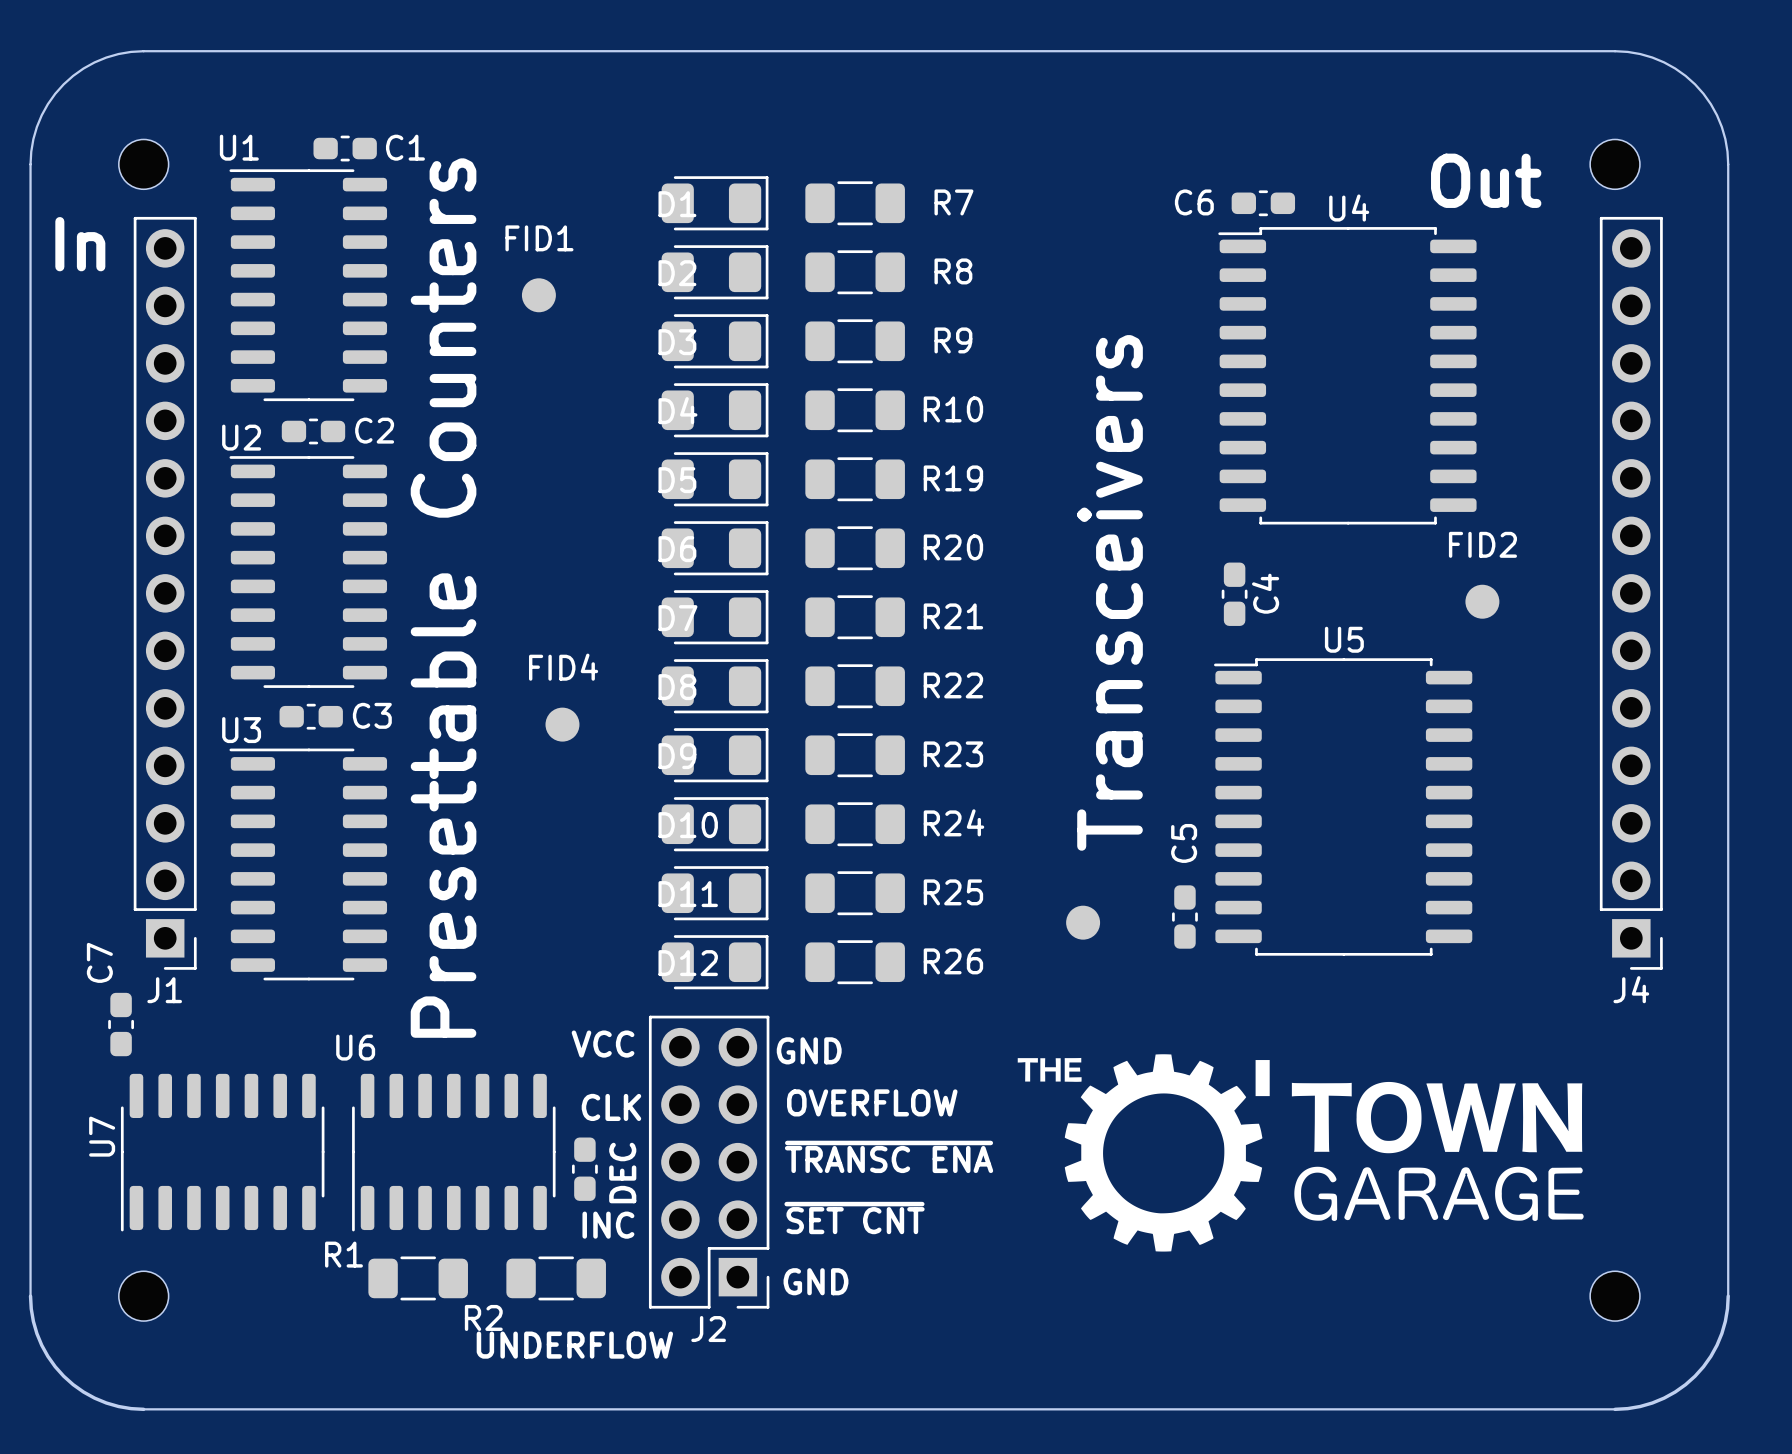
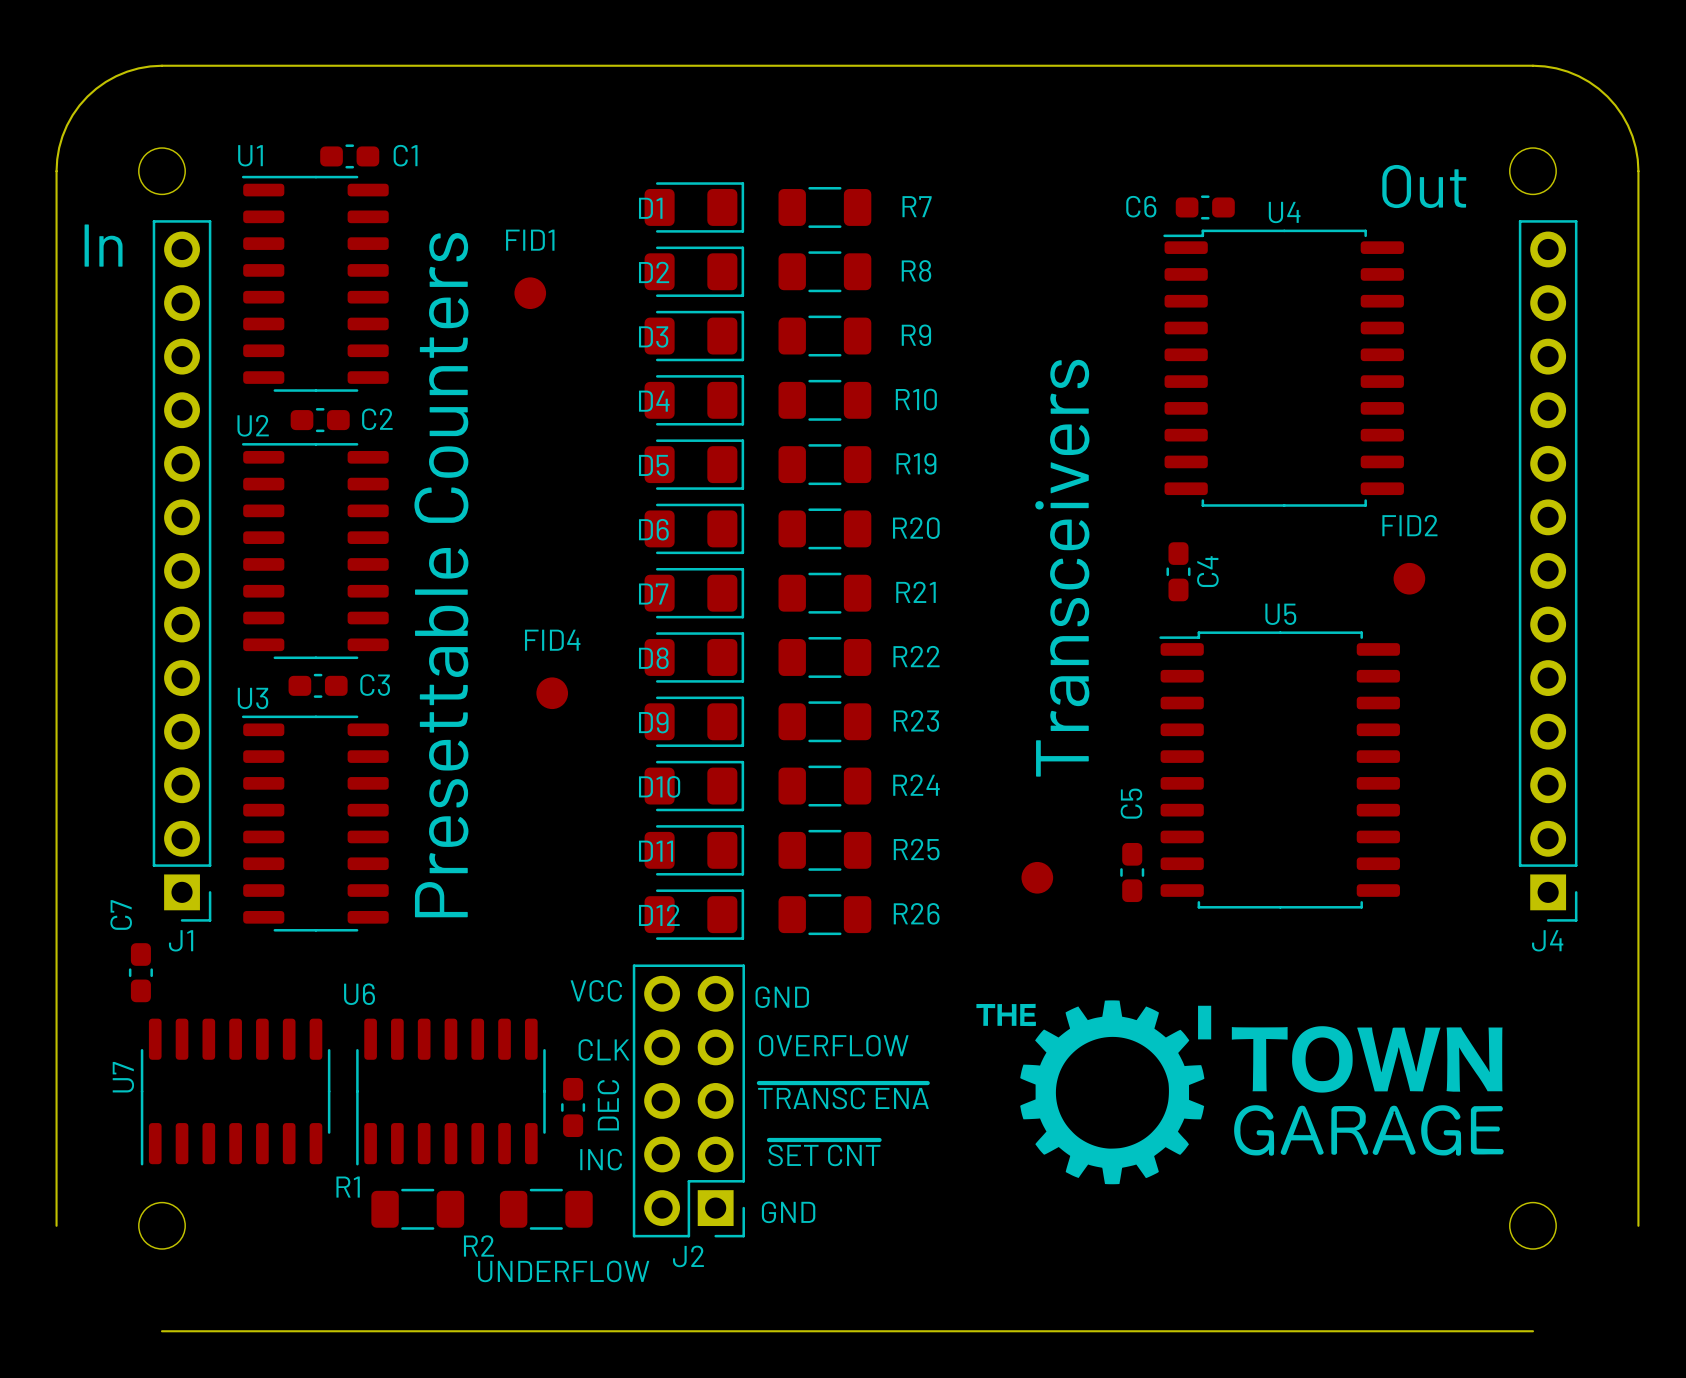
board edge: (30, 1296) (33, 1321) (41, 1345) (63, 1376) (83, 1391) (106, 1402) (143, 1409) -> none
board edge: (1728, 1296) (1725, 1321) (1717, 1345) (1695, 1376) (1664, 1398) (1640, 1406) (1615, 1409) -> none

